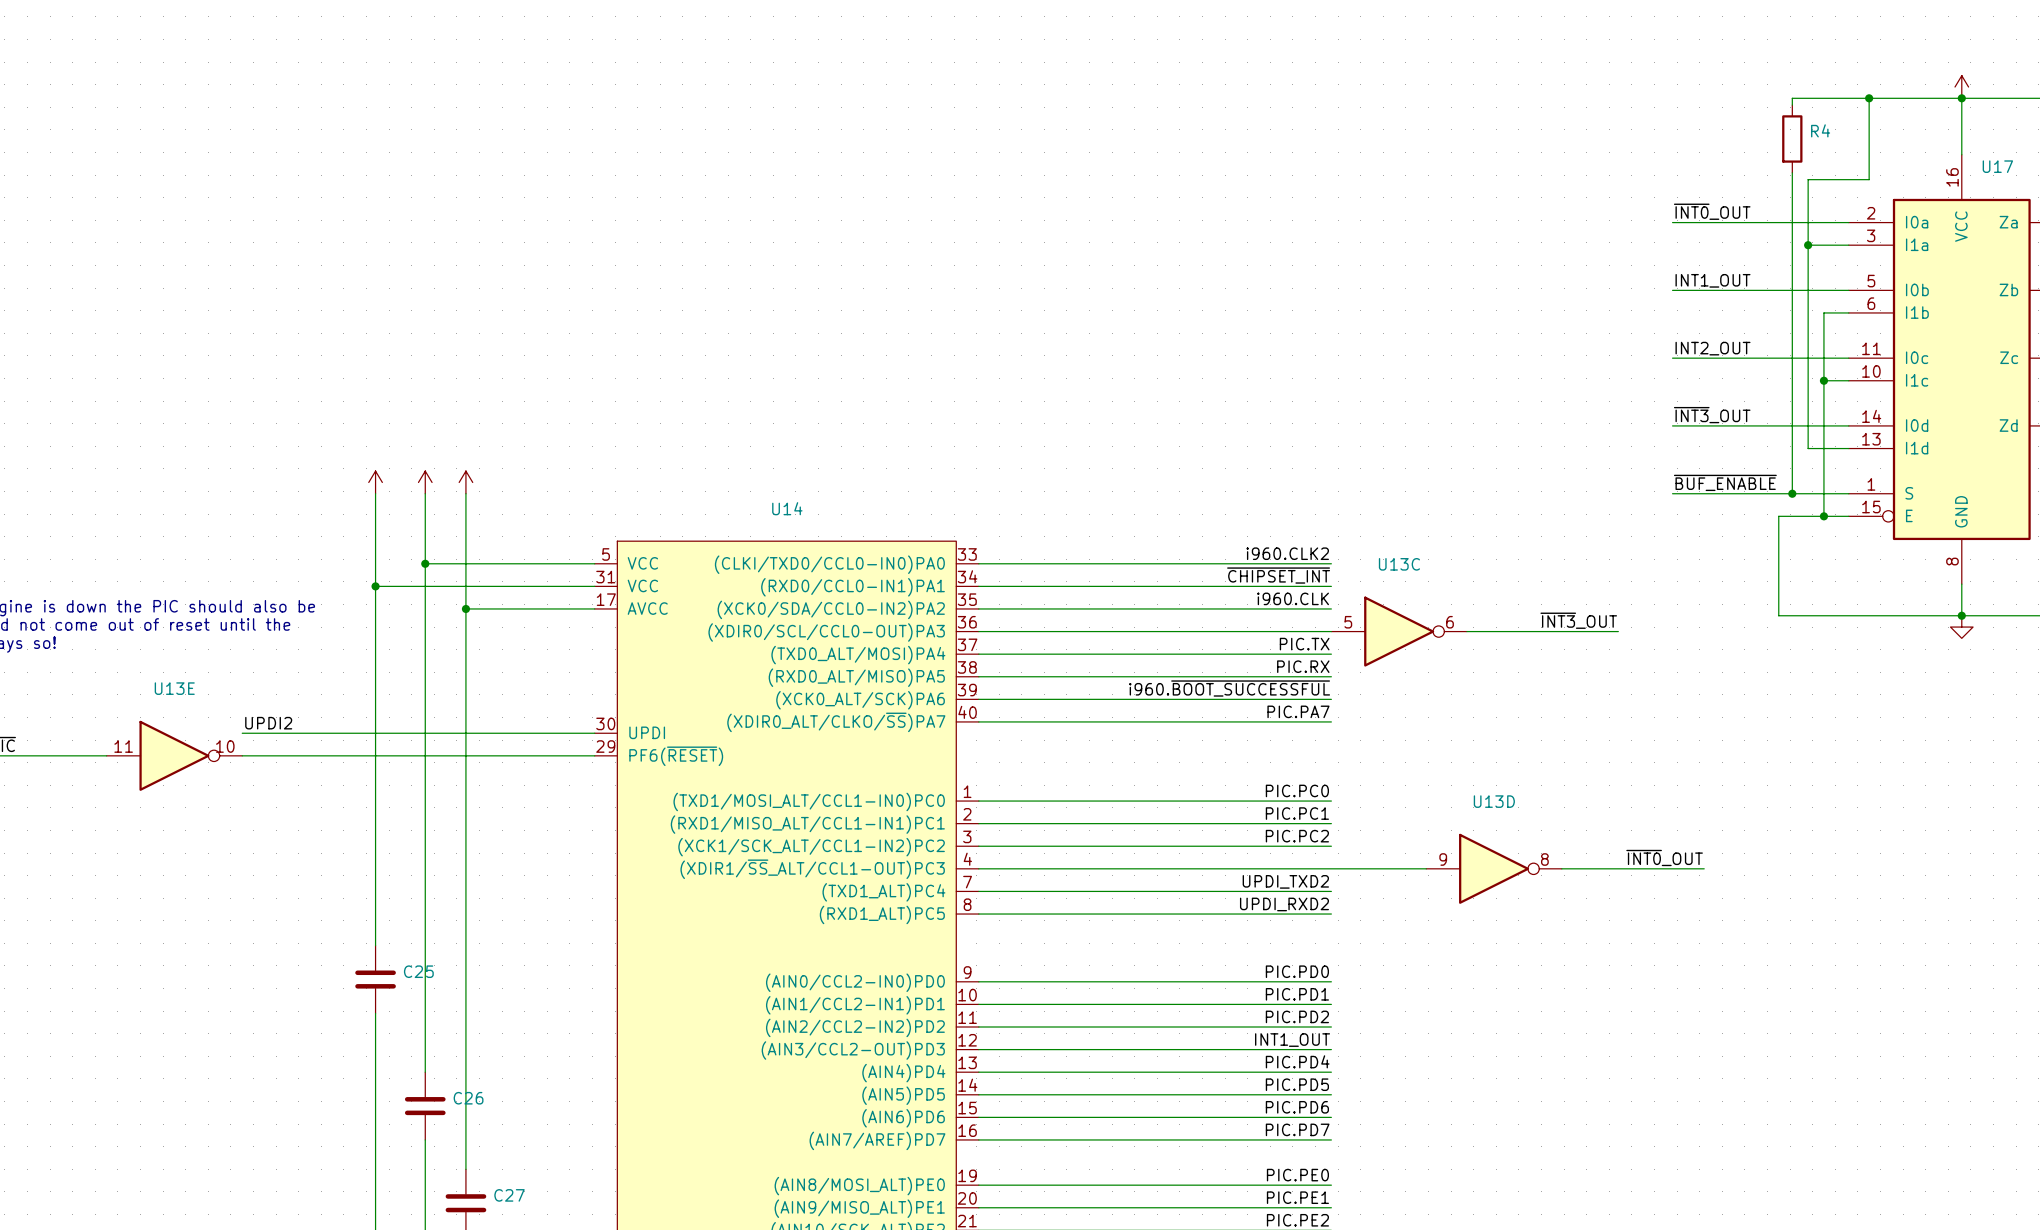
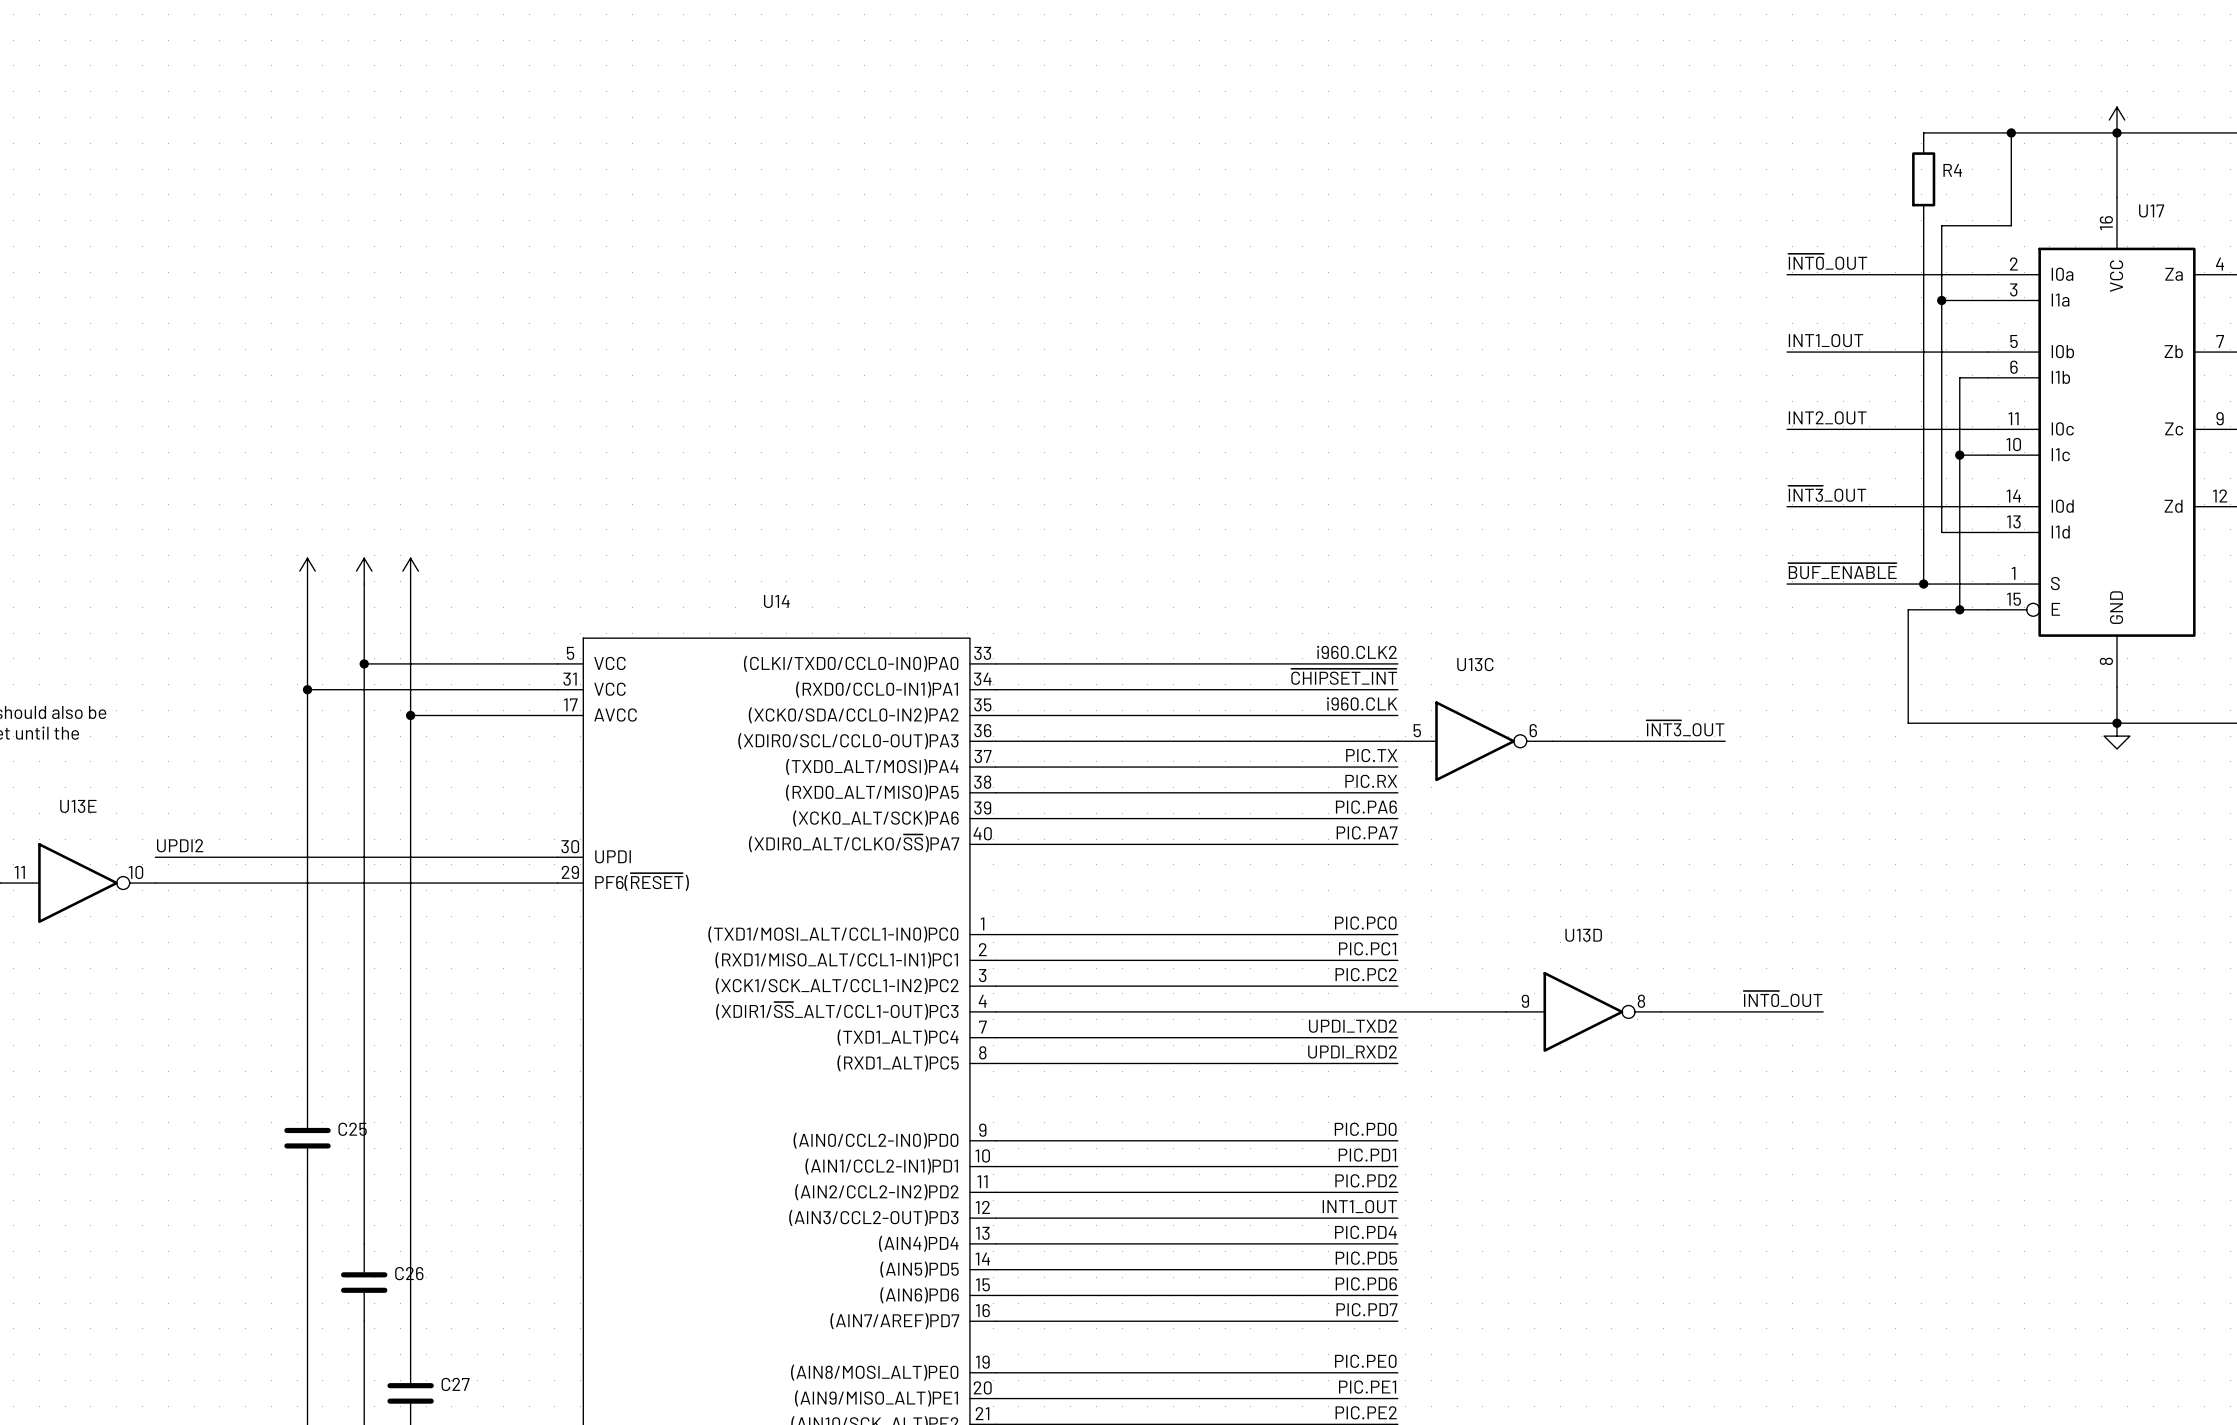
label: i960.~{BOOT_SUCCESSFUL} (1229, 688) -> PIC.PA6 (1366, 807)

